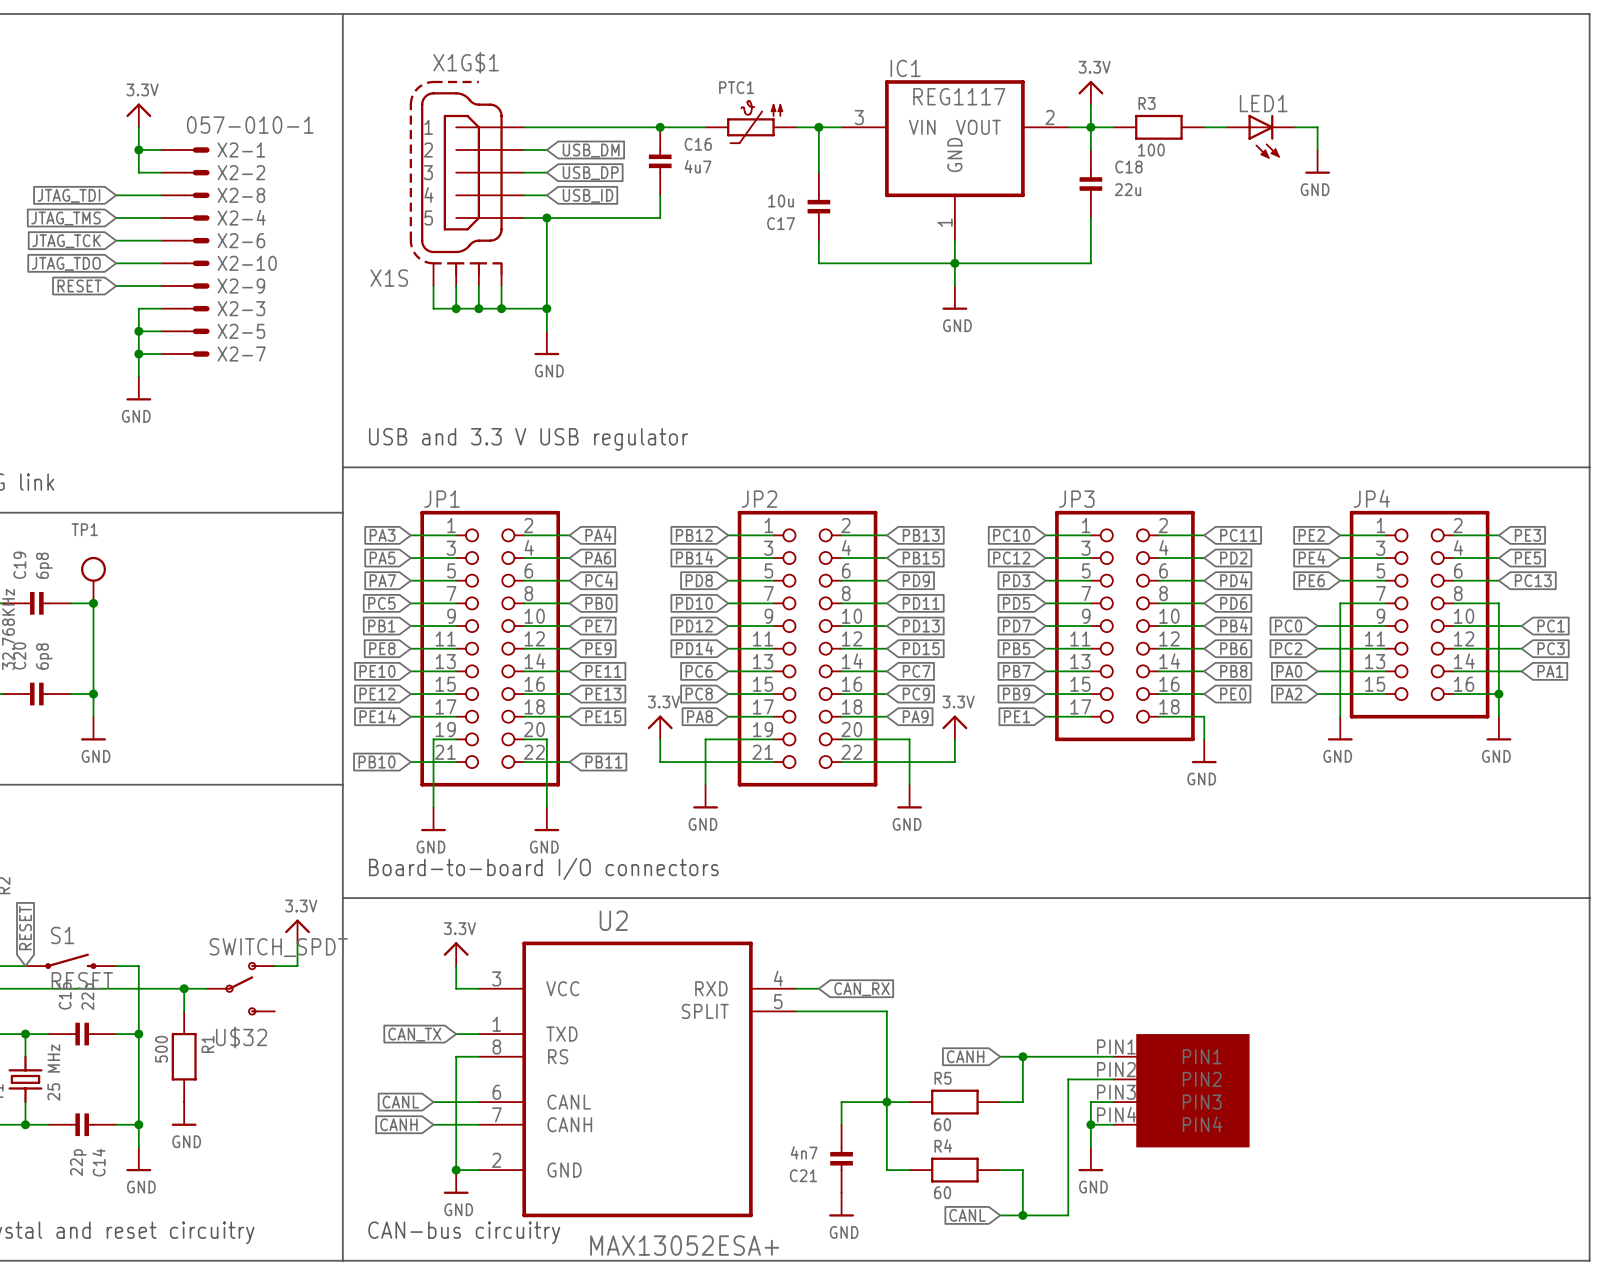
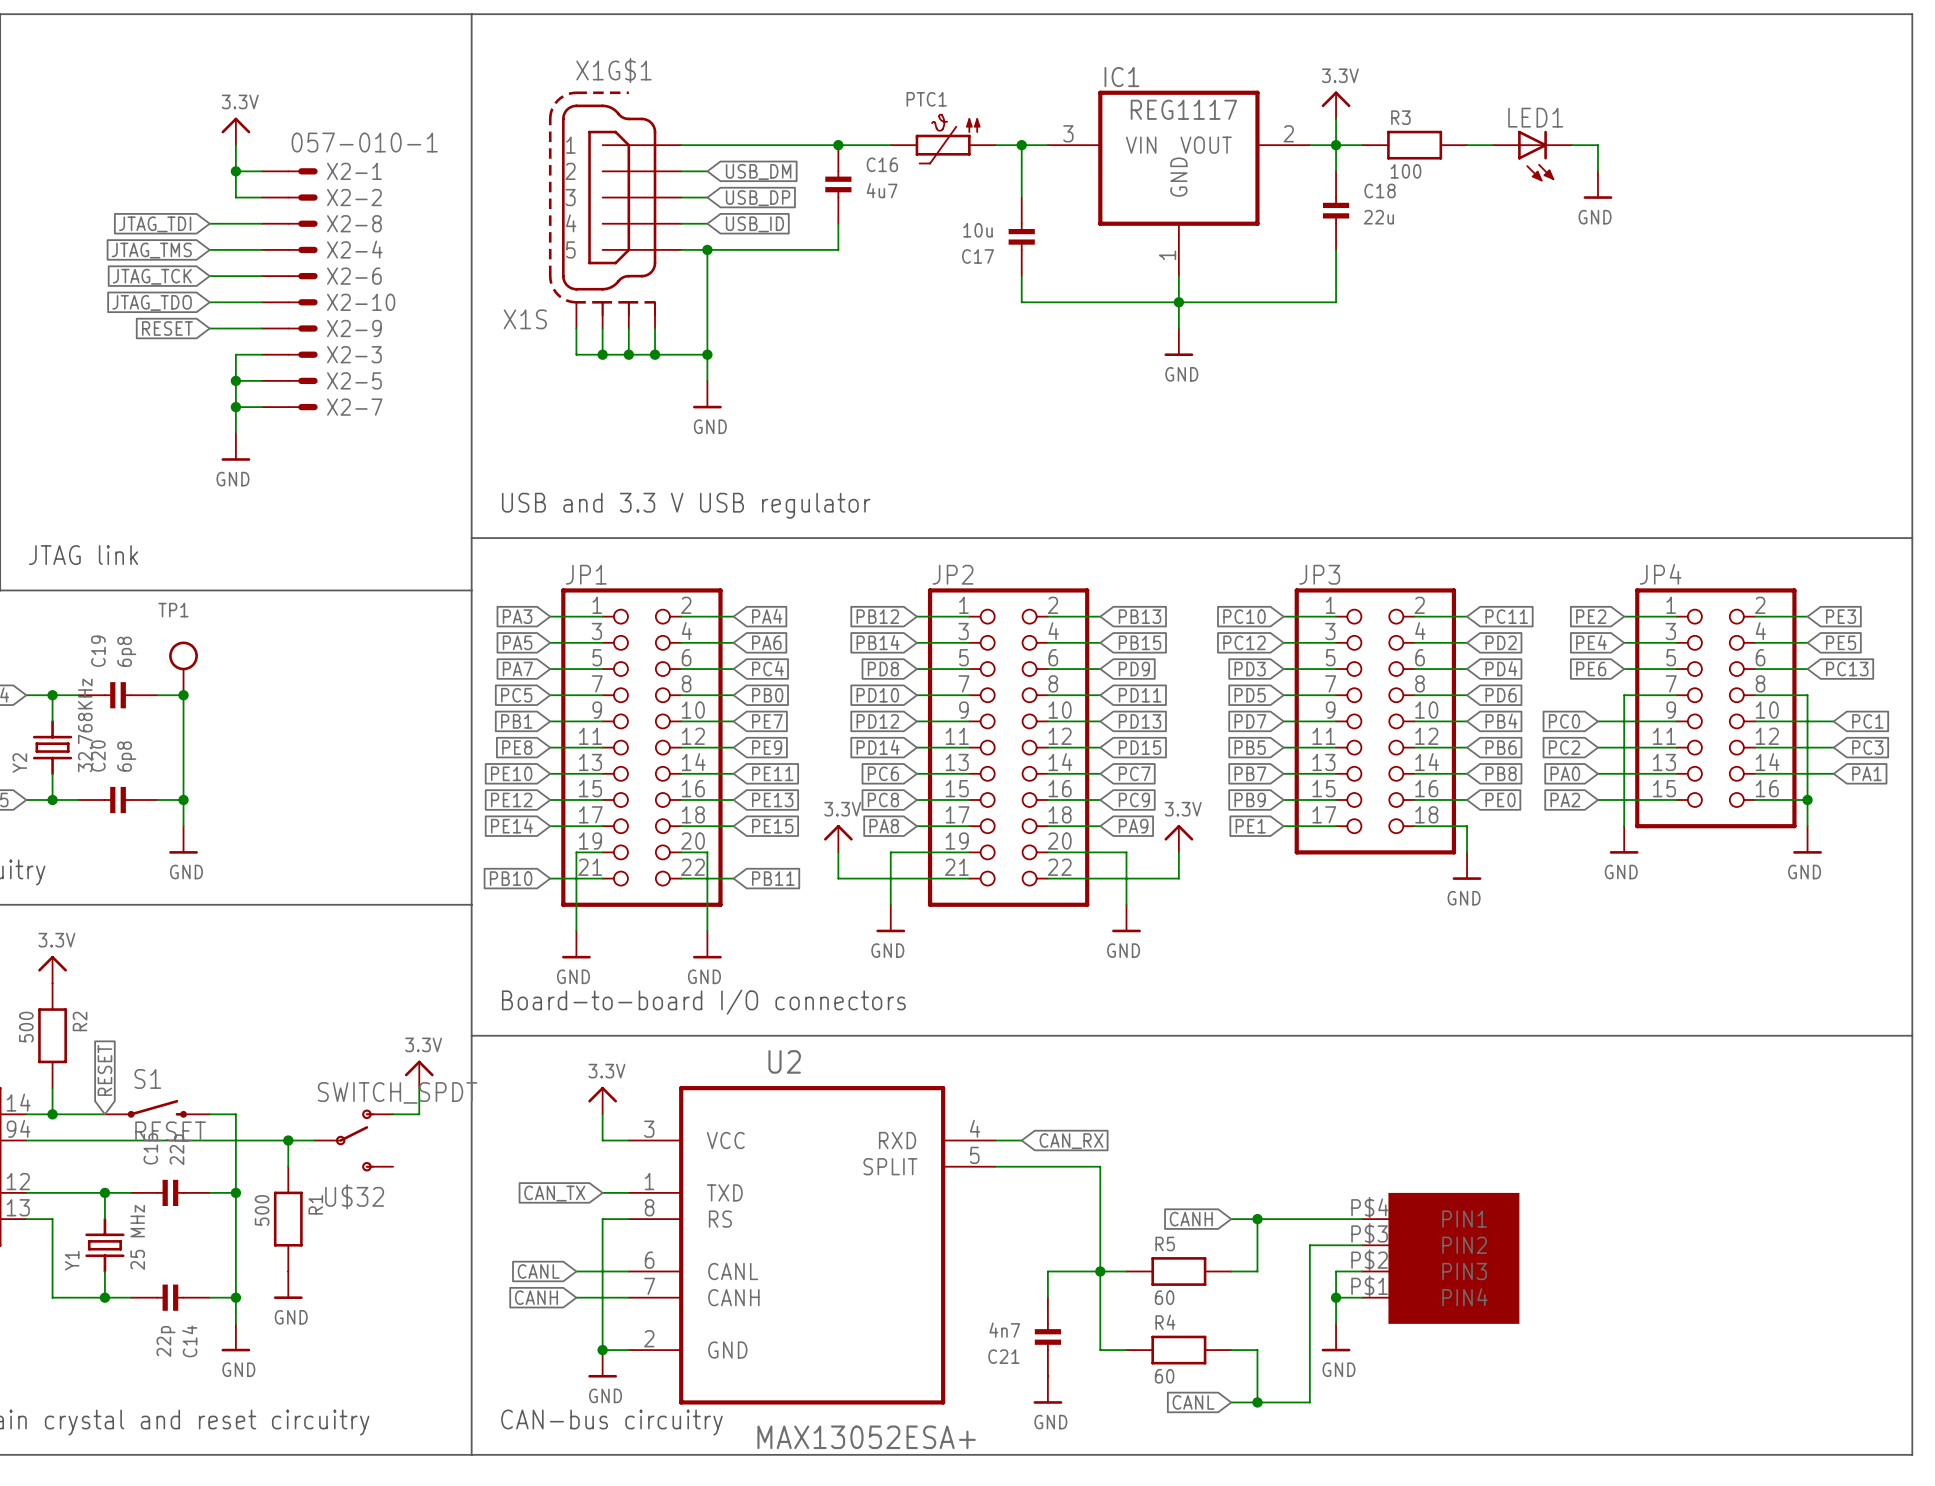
part pin number: PIN1 (1116, 1046) -> P$4 (1369, 1207)
part pin number: PIN2 (1116, 1069) -> P$3 (1369, 1233)
part pin number: PIN3 (1116, 1092) -> P$2 (1369, 1260)
part pin number: PIN4 (1116, 1114) -> P$1 (1369, 1286)

